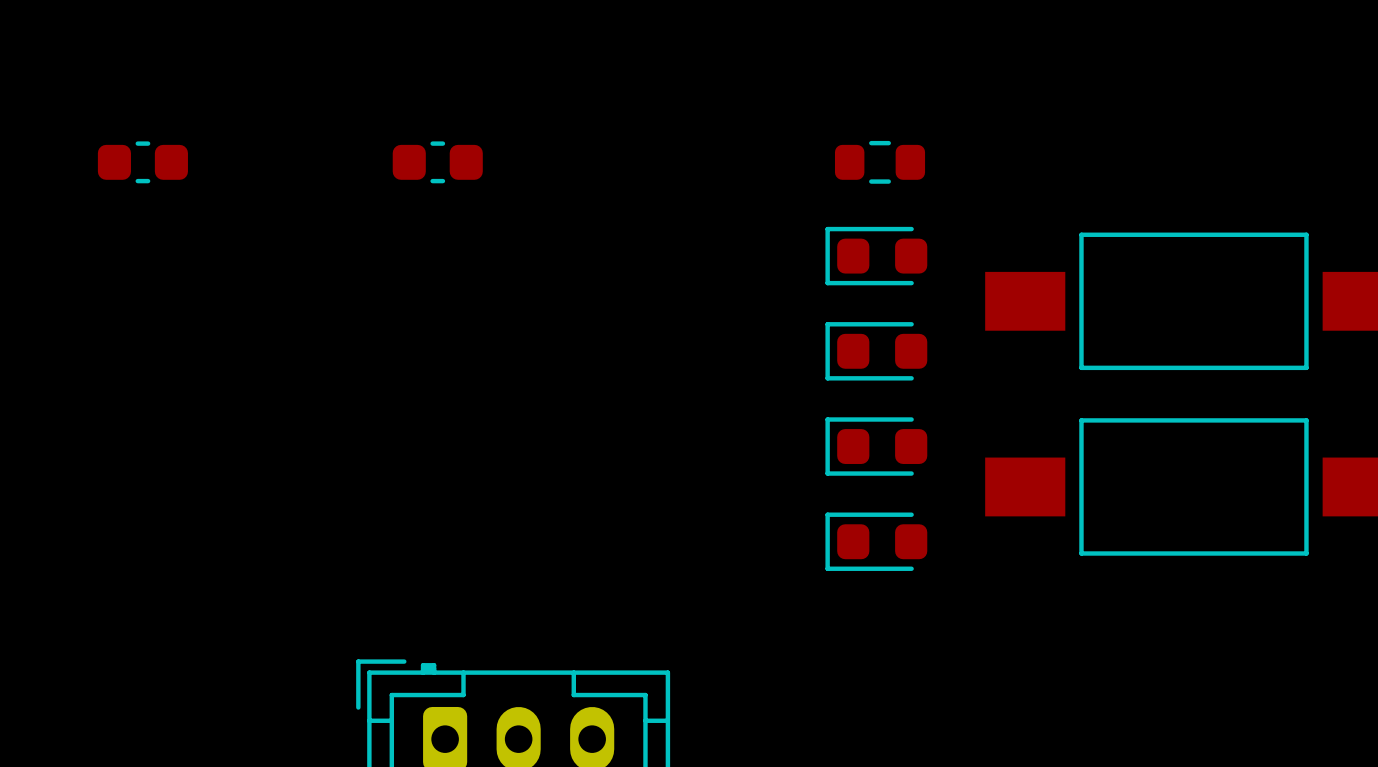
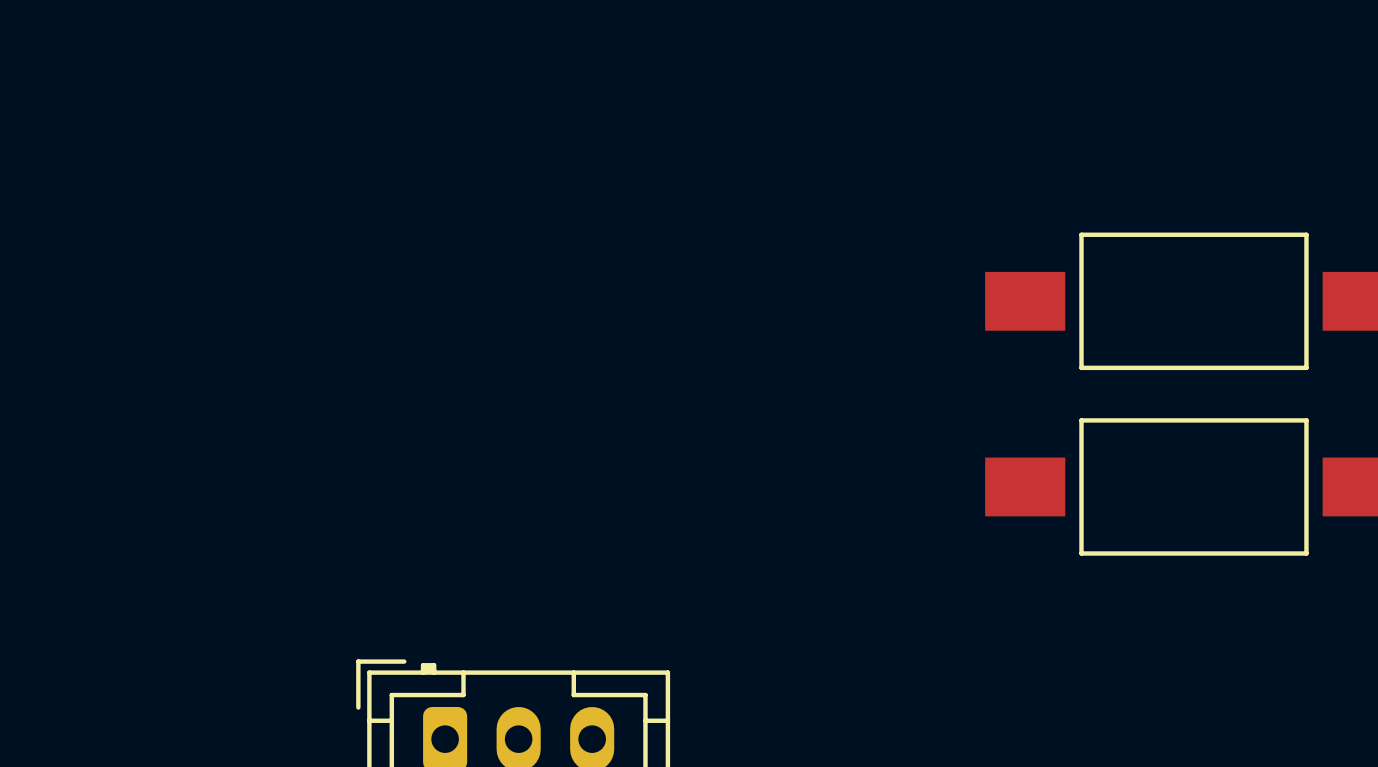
part: (142, 162) -> none
part: (437, 162) -> none
part: (880, 162) -> none
part: (876, 256) -> none
part: (876, 351) -> none
part: (876, 446) -> none
part: (876, 541) -> none

